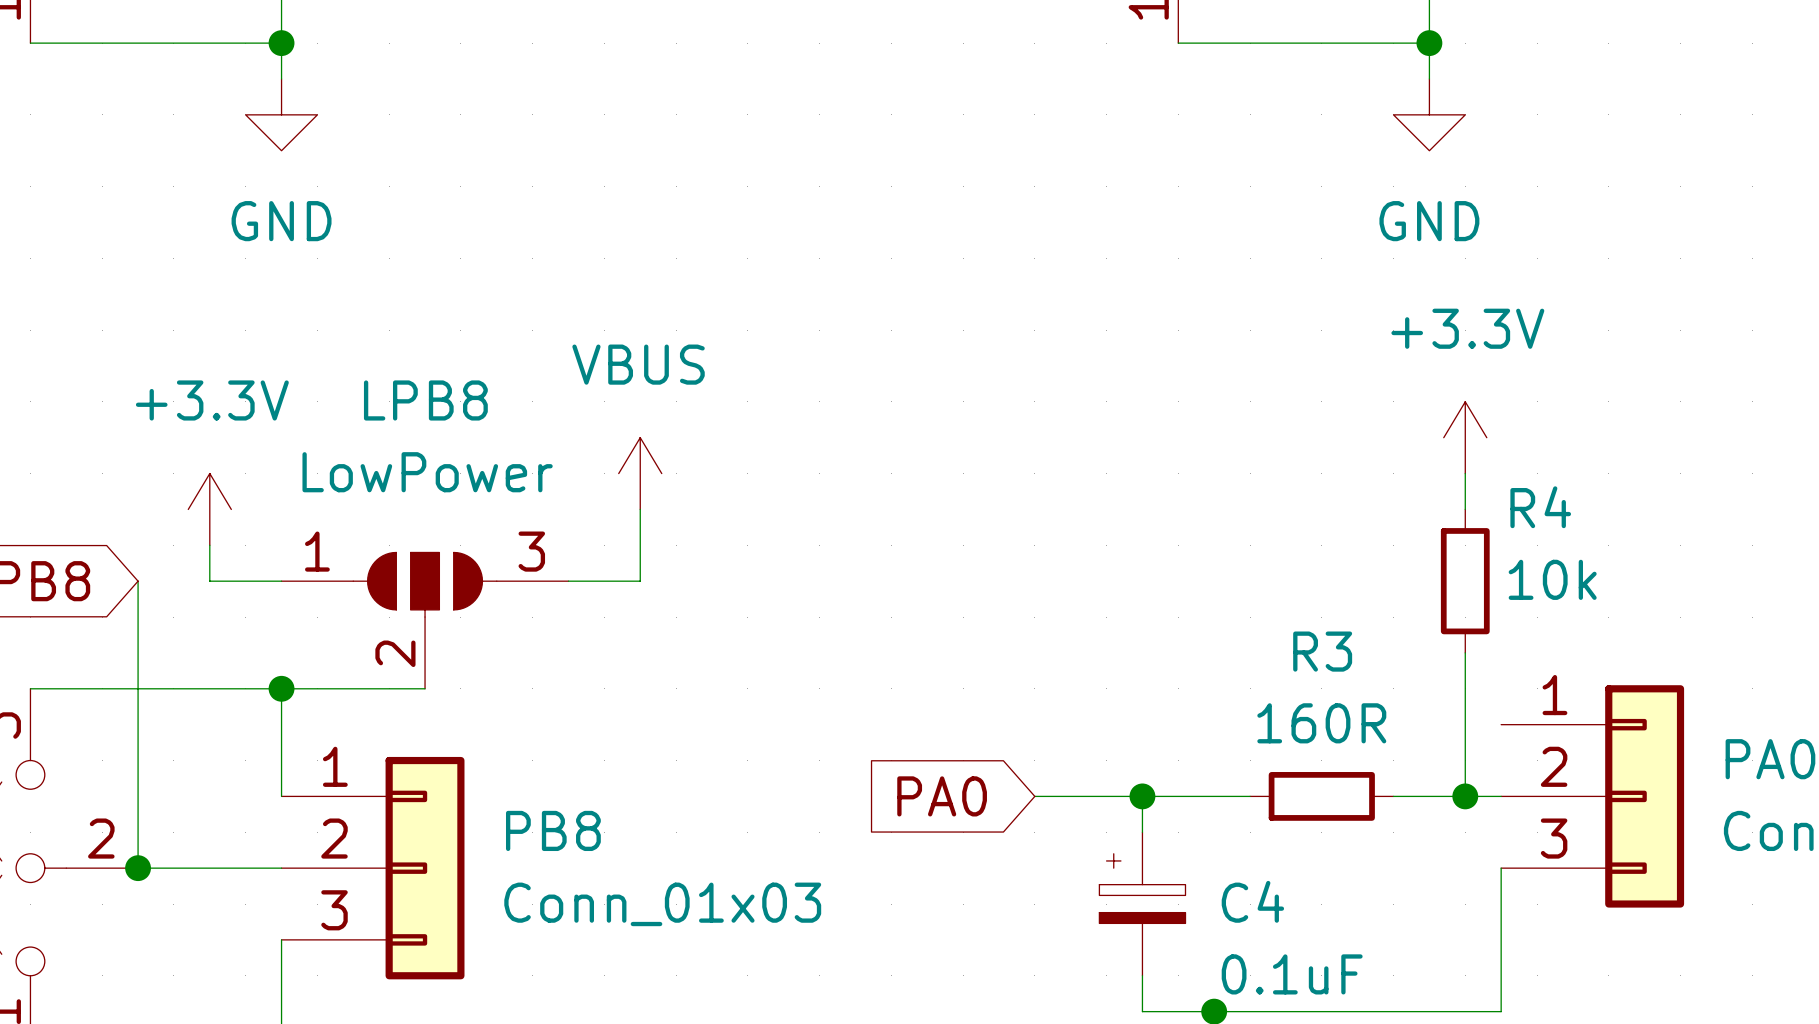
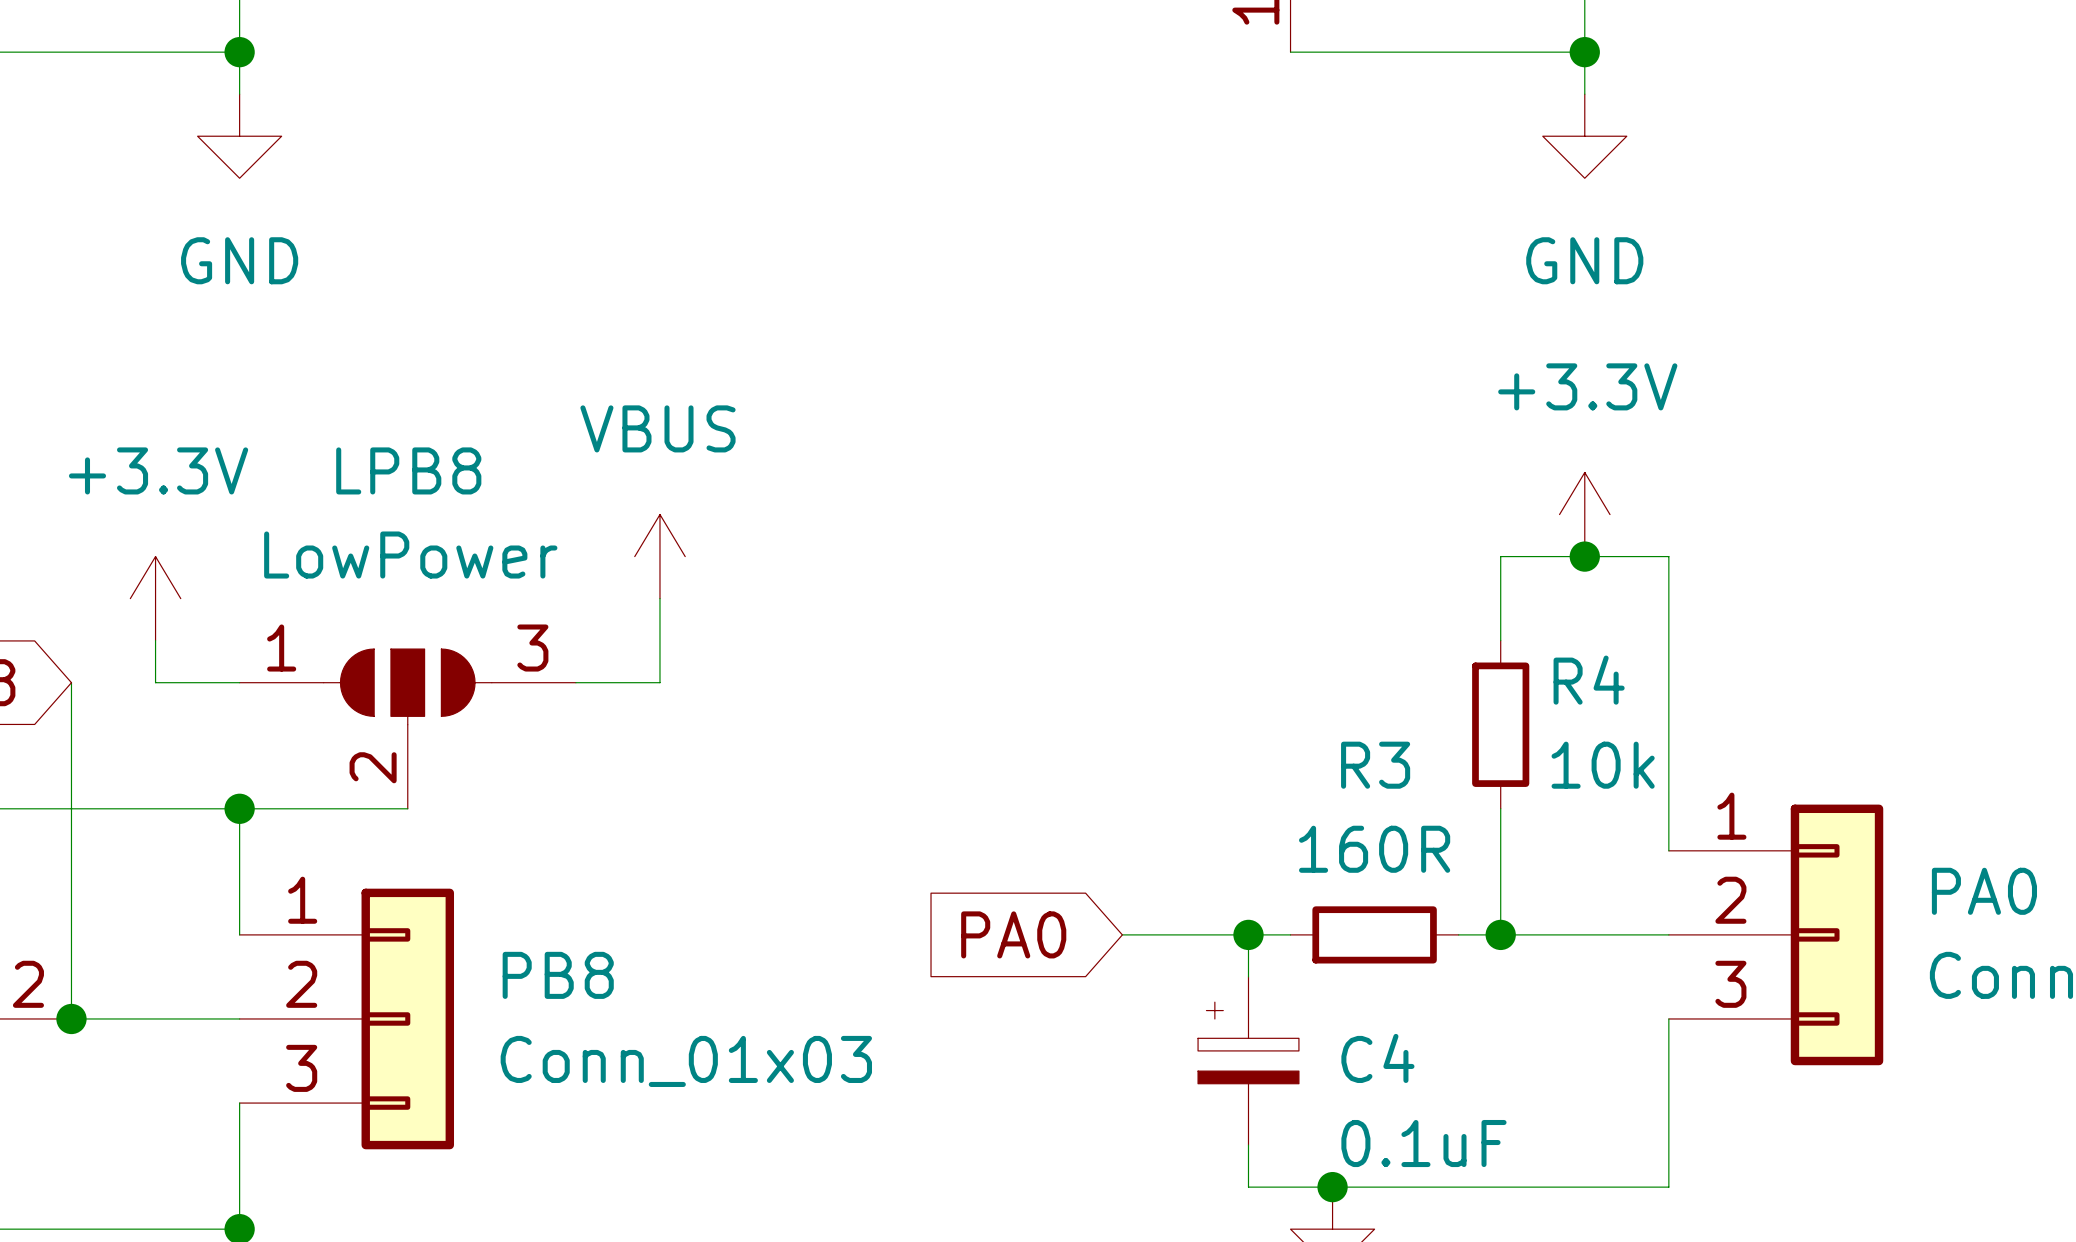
power symbol position: +3.3V (1465, 437) -> +3.3V (1584, 514)
junction: none -> (1584, 556)
wire: (1465, 473) (1465, 509) -> none
R4 name position: R4 (1540, 507) -> R4 (1589, 680)
wire: none -> (1500, 640) (1500, 556) (1668, 556) (1668, 850)
R4 value position: 10k (1552, 579) -> 10k (1603, 765)
R4 position: (1465, 581) -> (1500, 724)
wire: (1465, 652) (1465, 796) -> none
wire: none -> (1500, 808) (1500, 934)
wire: (1178, 796) (1250, 796) -> (1458, 934) (1542, 934)
R3 position: (1321, 796) -> (1374, 934)
junction position: (1465, 796) -> (1500, 934)

